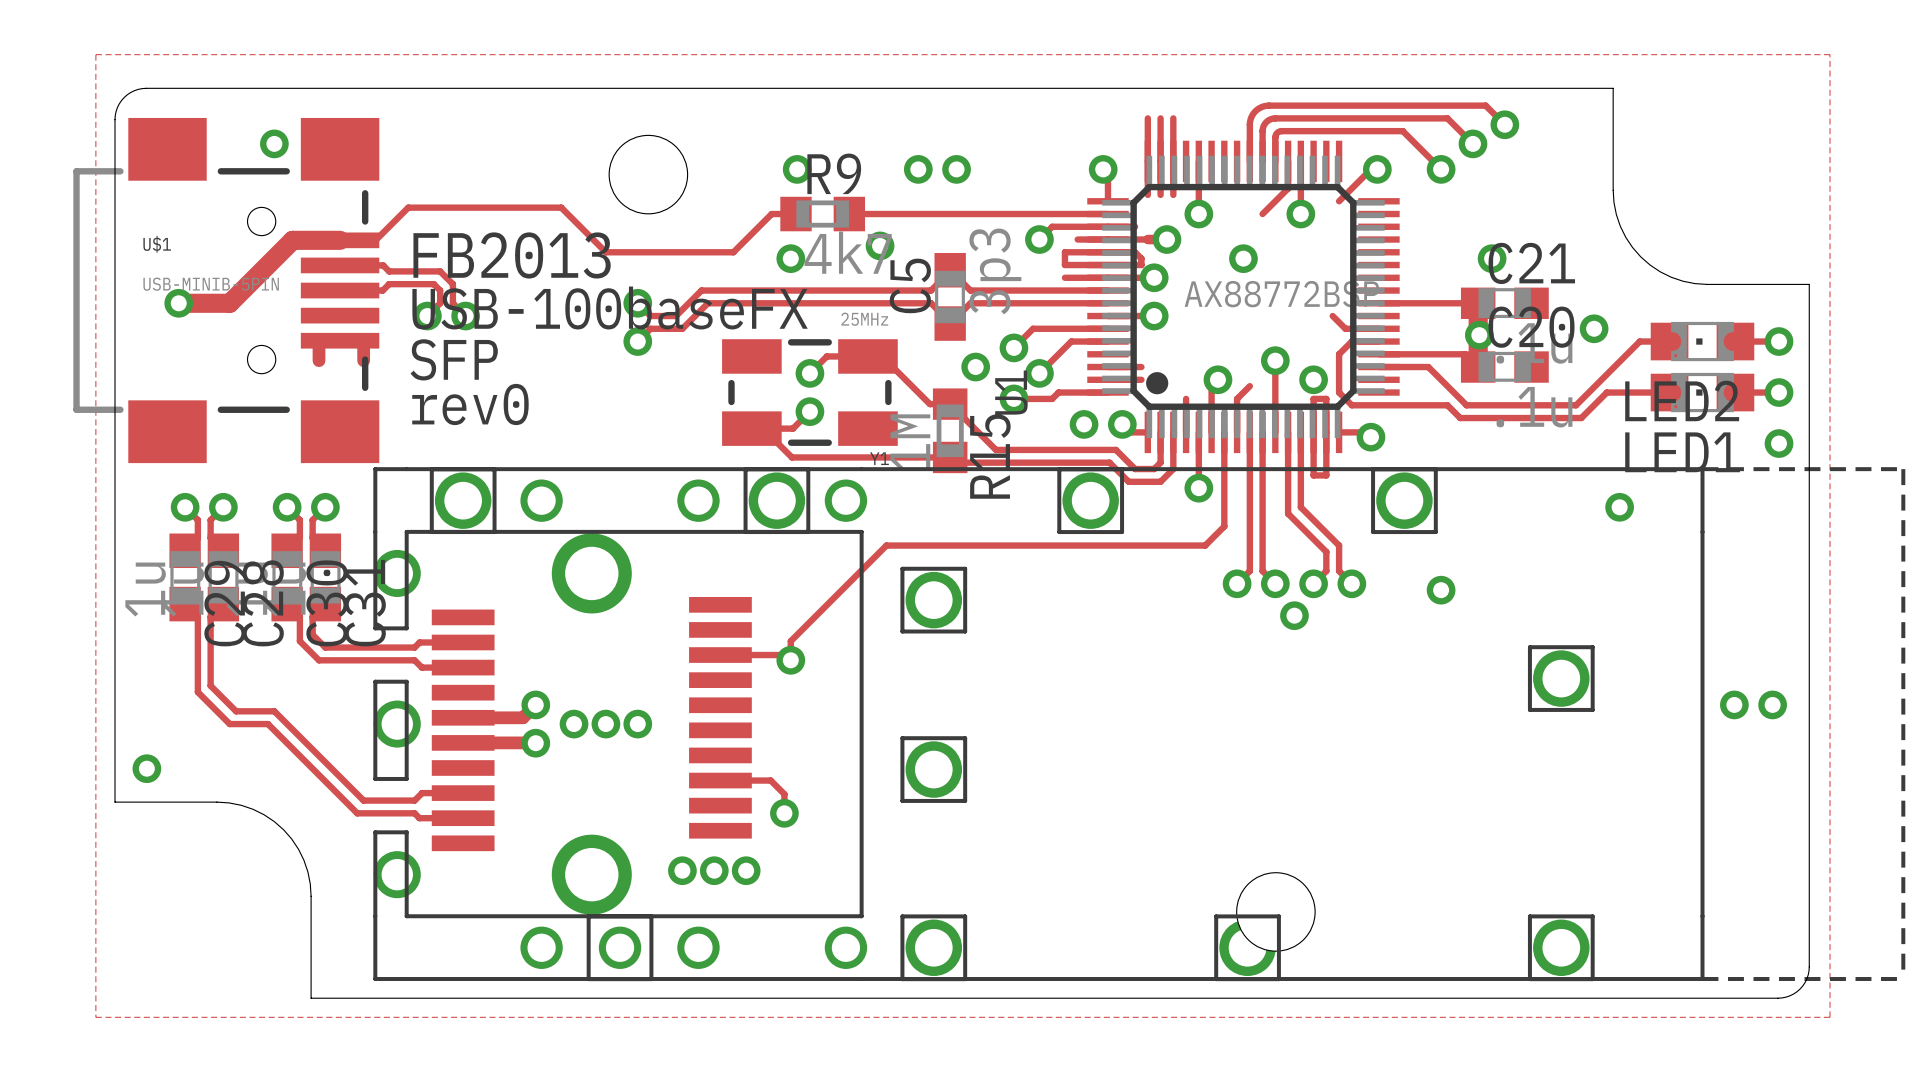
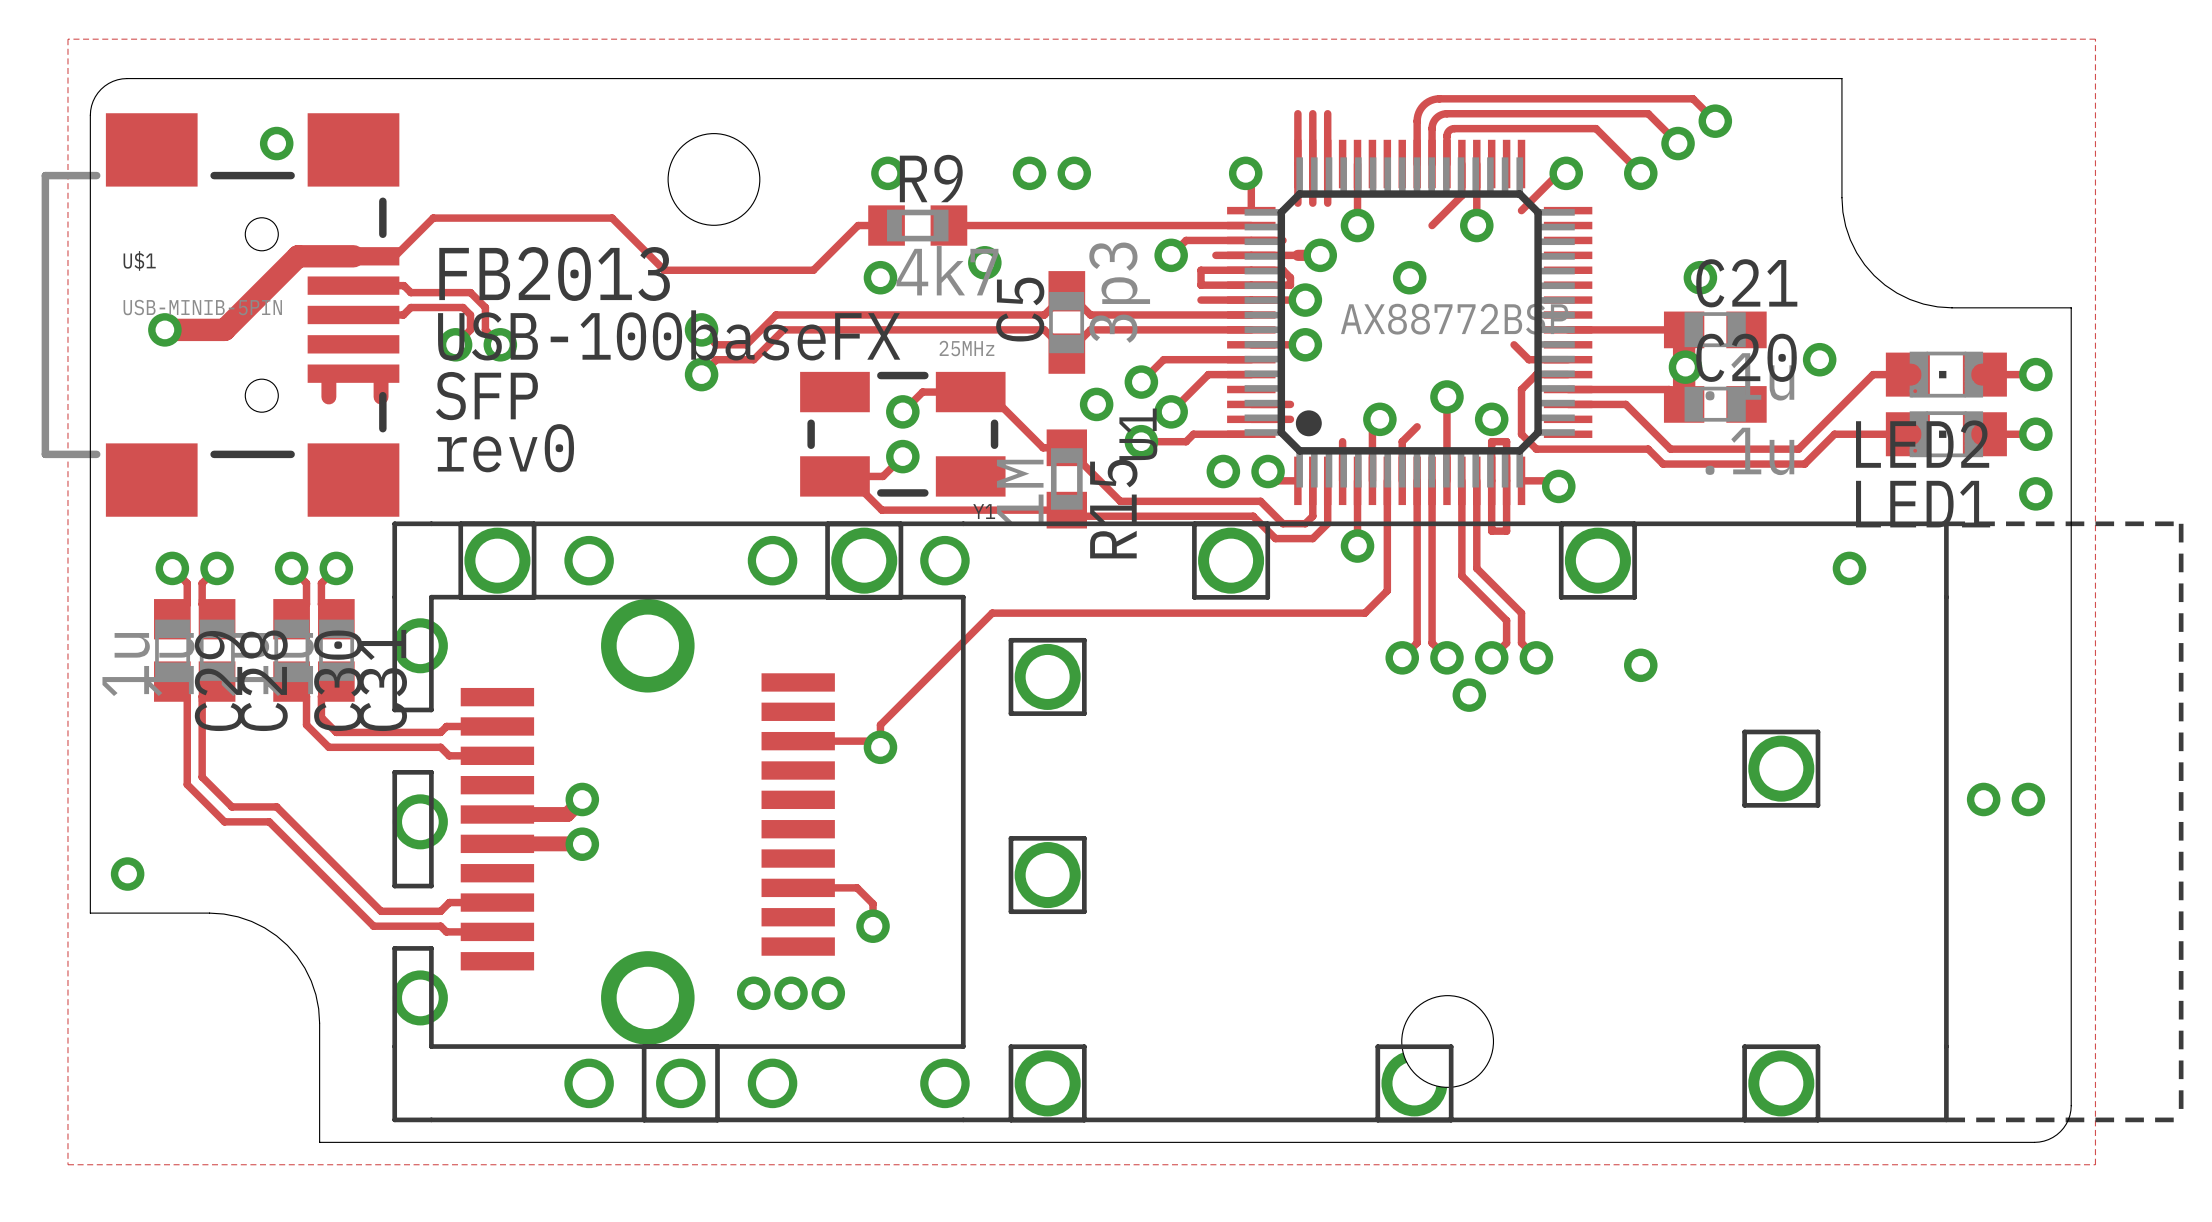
via: (574, 724) -> none
via: (605, 724) -> none
via: (637, 724) -> none

